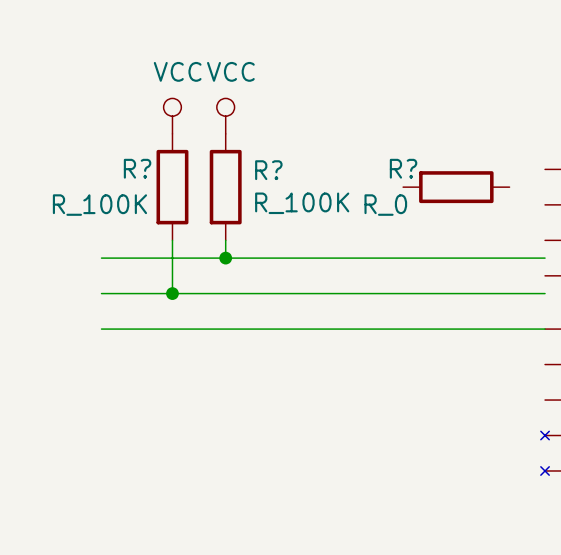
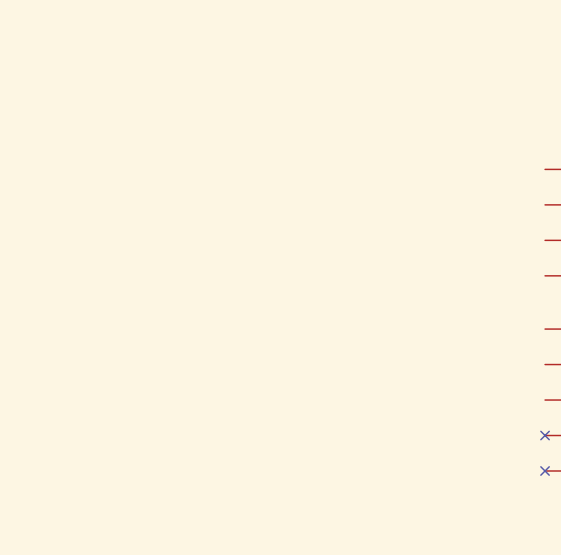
power symbol: VCC (172, 116) -> none
power symbol: VCC (225, 116) -> none
R?: R_100K (172, 187) -> none
R?: R_100K (225, 187) -> none
R?: R_0 (456, 187) -> none
wire: (172, 240) (172, 293) -> none
wire: (225, 240) (225, 258) -> none
wire: (101, 258) (545, 258) -> none
junction: (225, 258) -> none
wire: (101, 293) (545, 293) -> none
junction: (172, 293) -> none
wire: (101, 329) (545, 329) -> none

